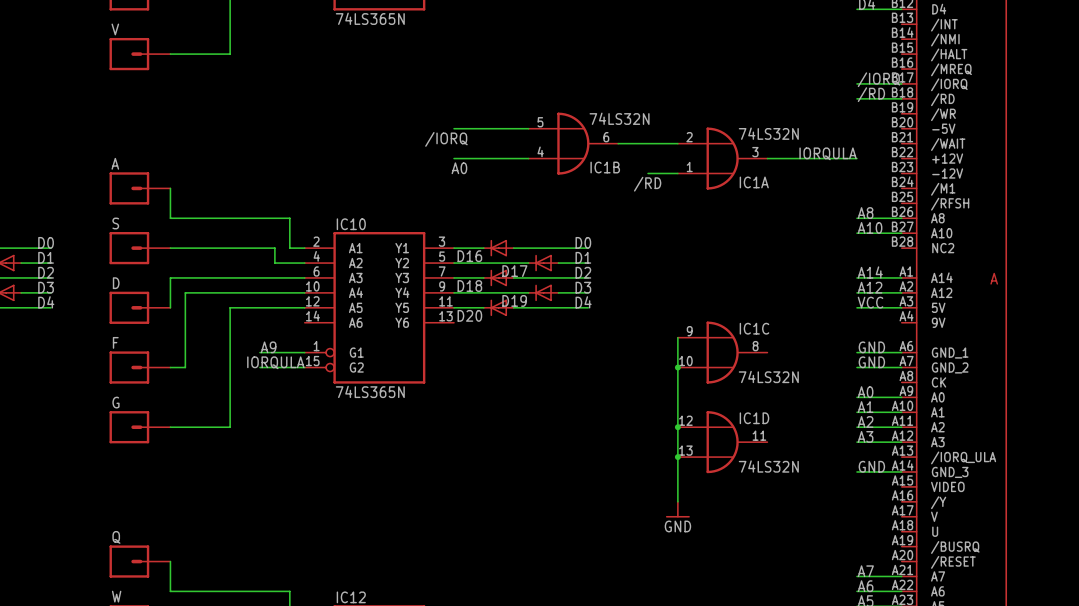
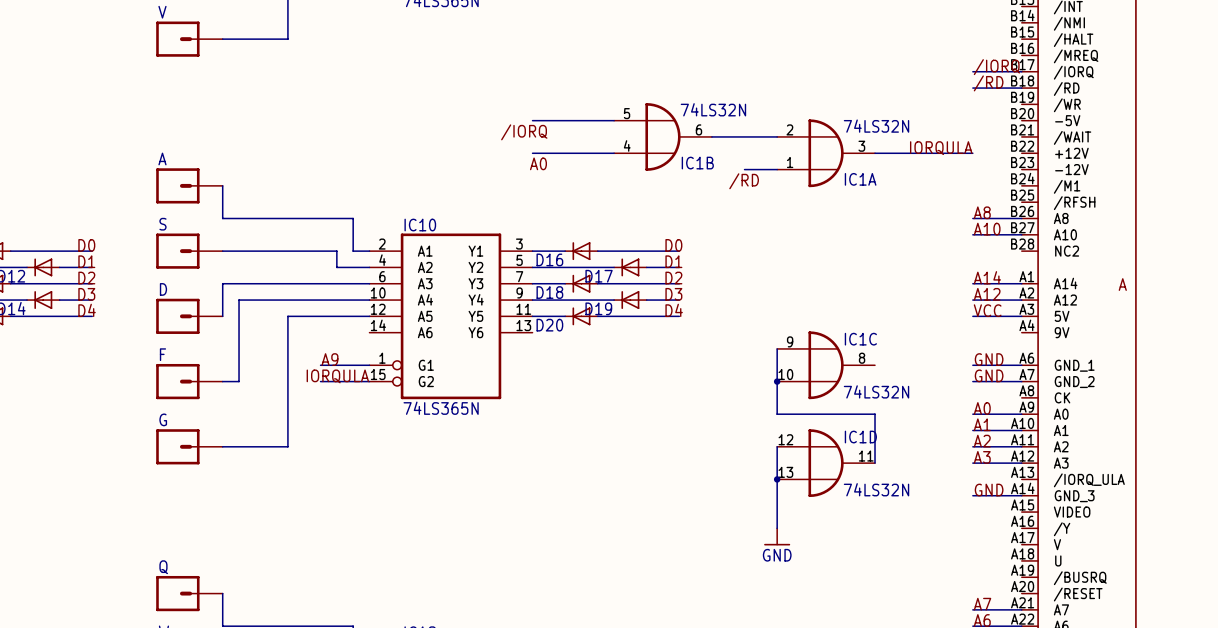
wire: (677, 397) (677, 427) -> (777, 414) (875, 414) (875, 463)
junction: (677, 427) -> none

